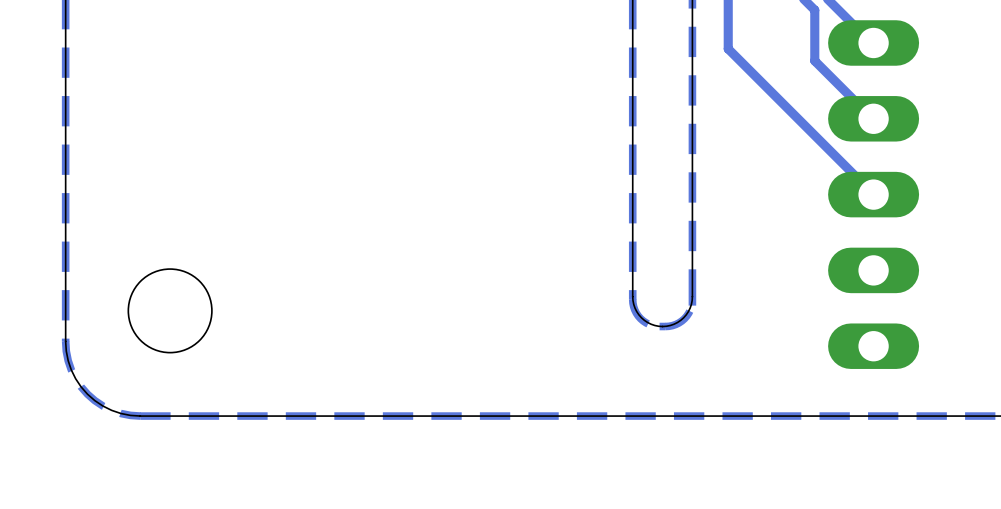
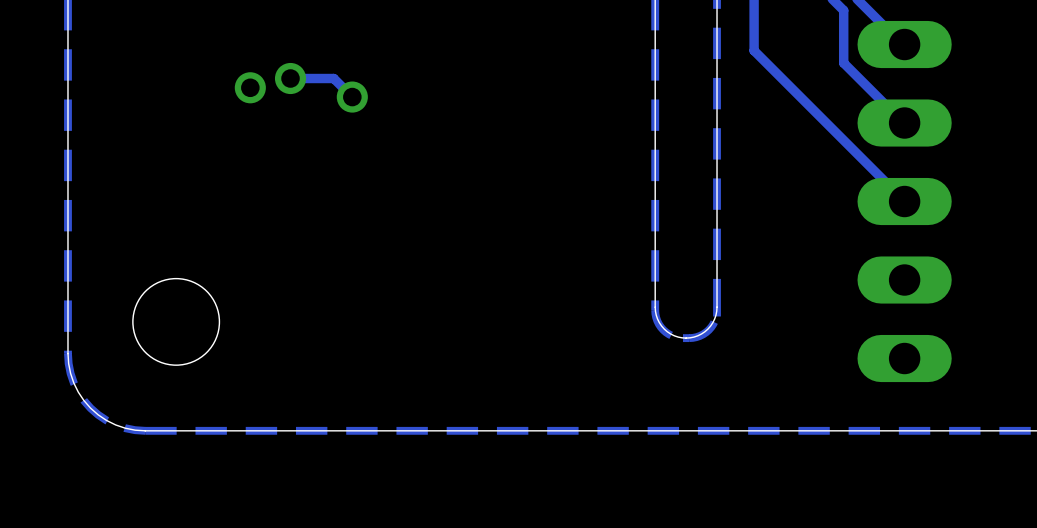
track: none -> (290, 78) (333, 78) (352, 97)
via: none -> (290, 78)
via: none -> (250, 87)
via: none -> (352, 97)

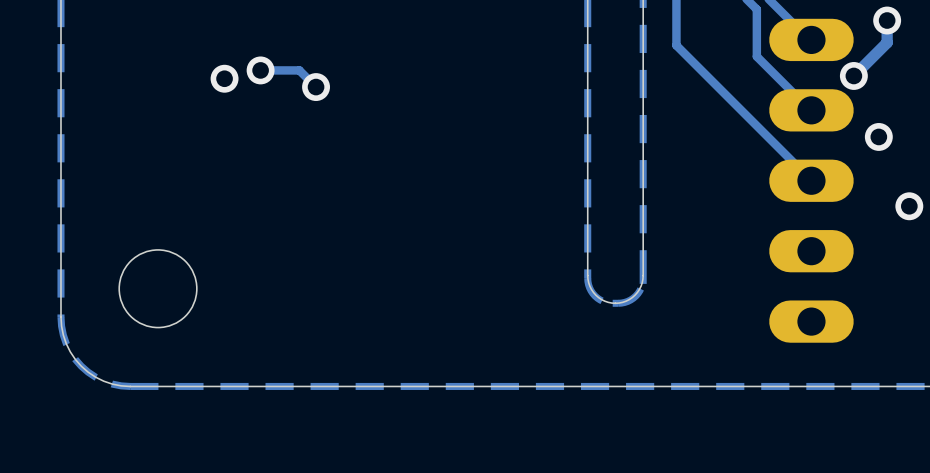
track: none -> (887, 20) (887, 42) (853, 75)
via: none -> (887, 20)
via: none -> (853, 75)
via: none -> (878, 136)
via: none -> (909, 206)

